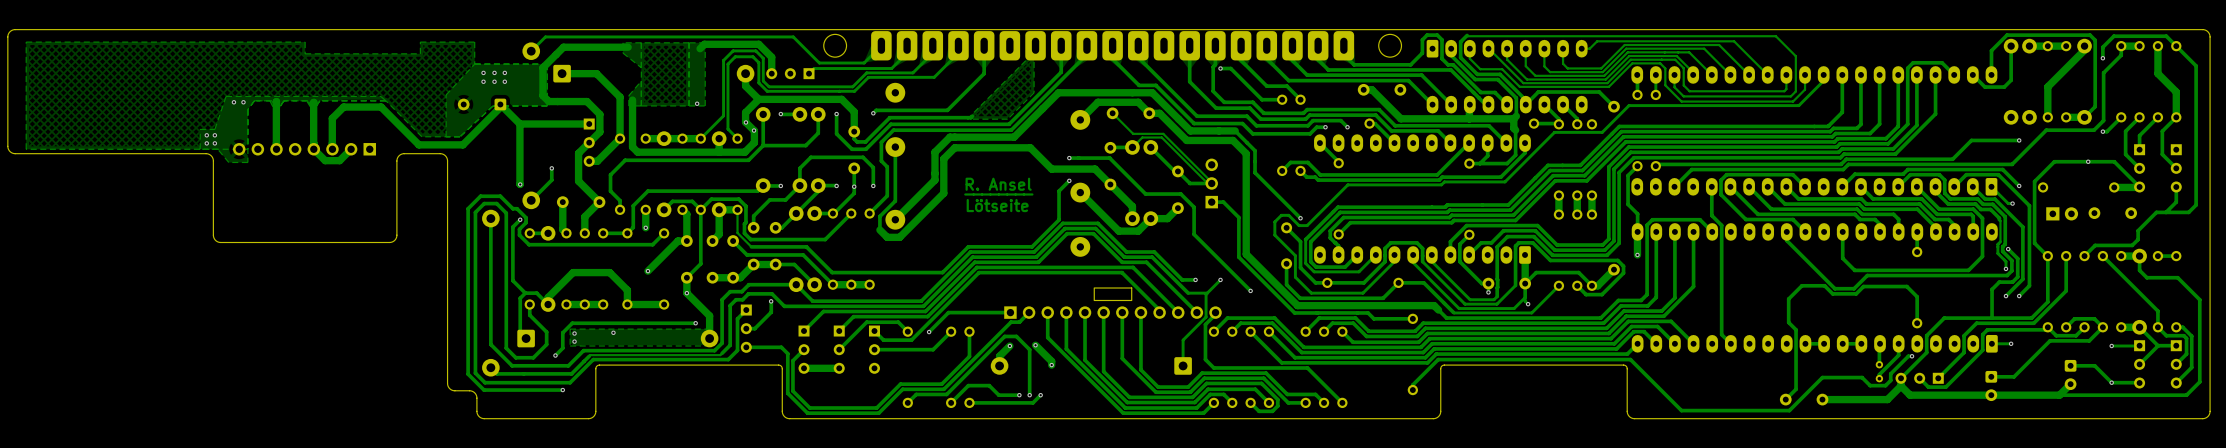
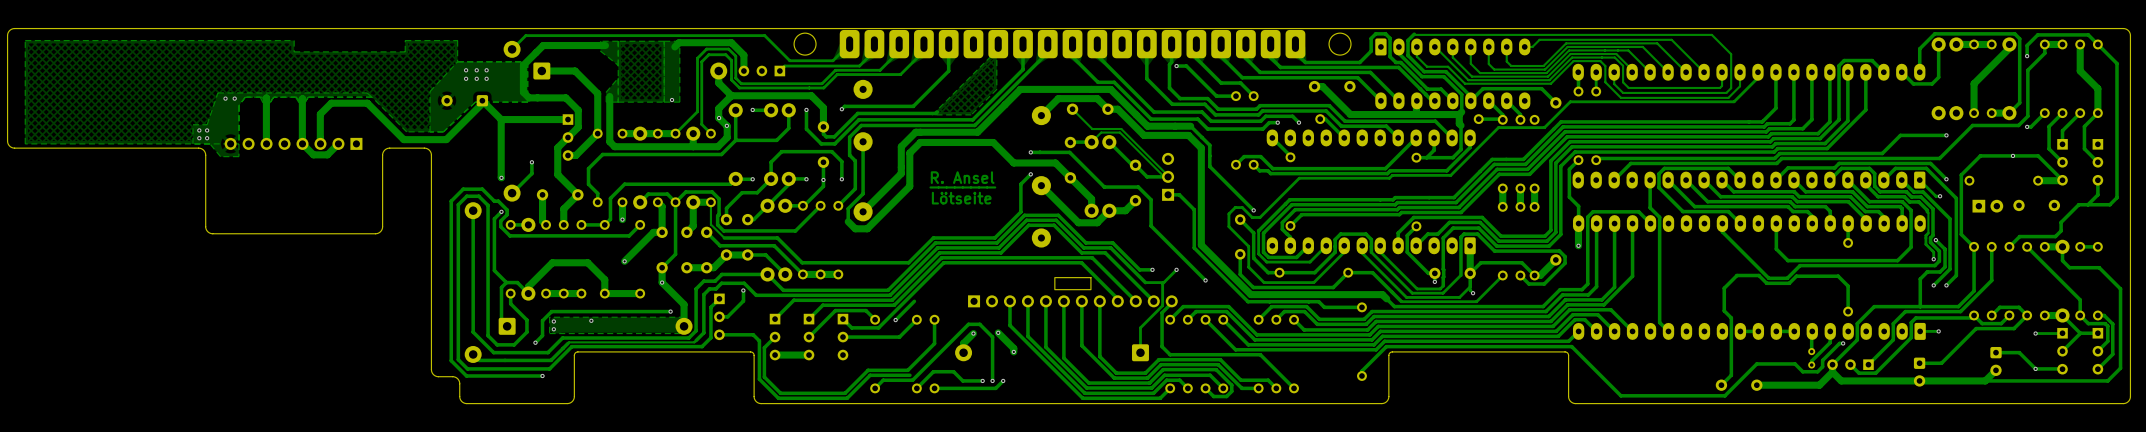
track: (1010, 312) (948, 312) -> none
track: (1029, 312) (1019, 322) (1011, 322) (943, 389) -> none

